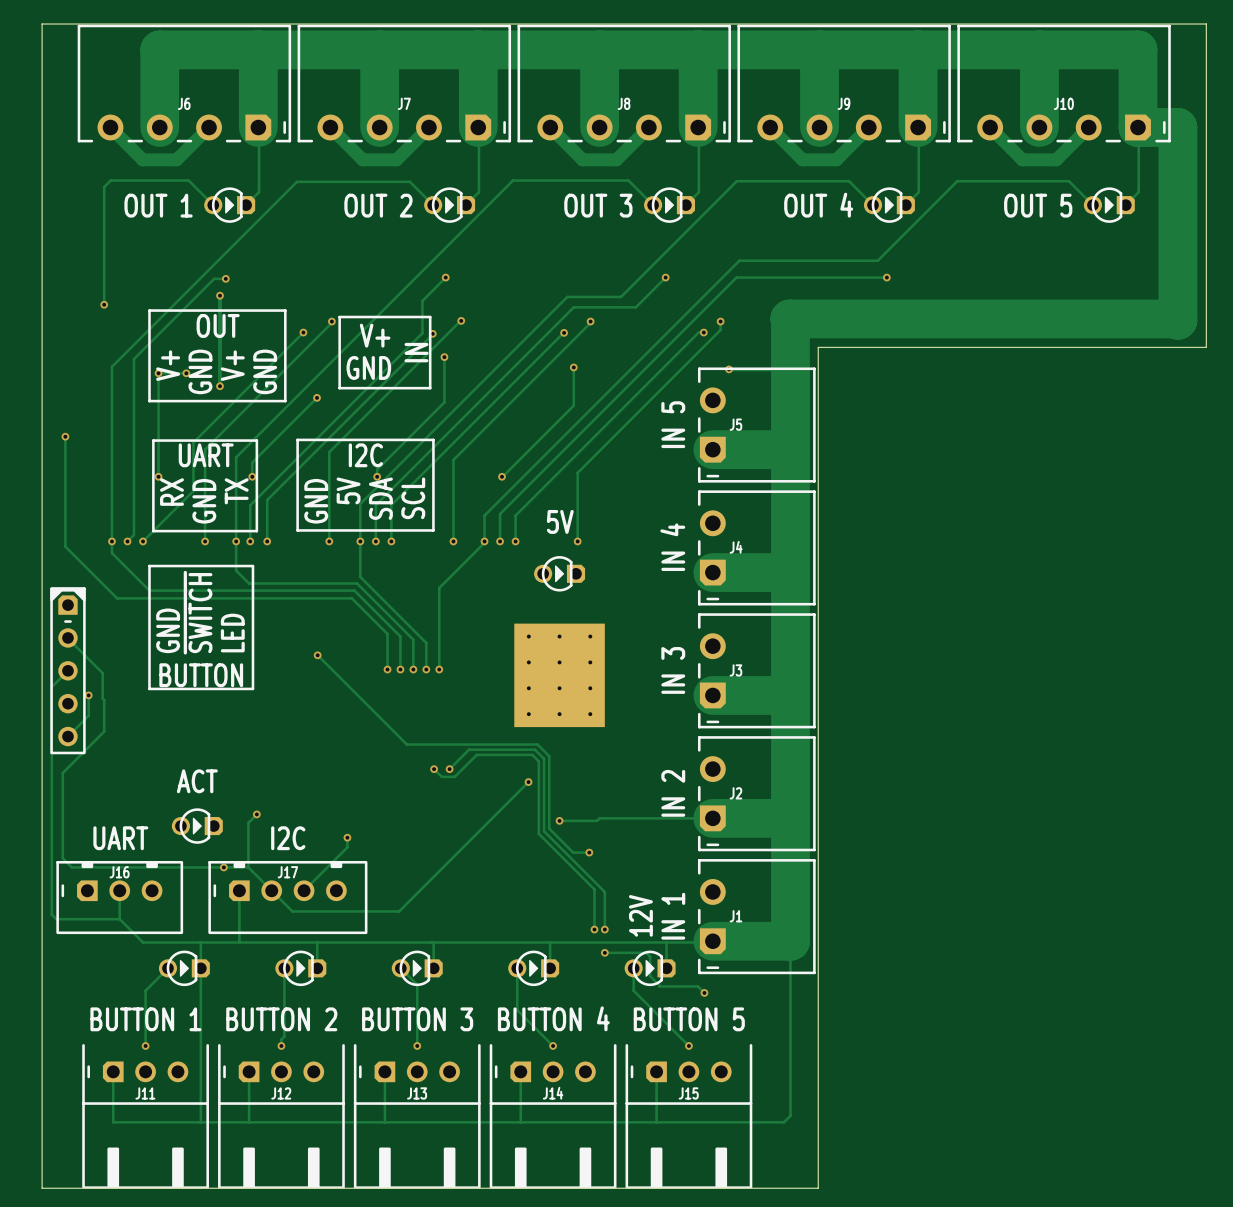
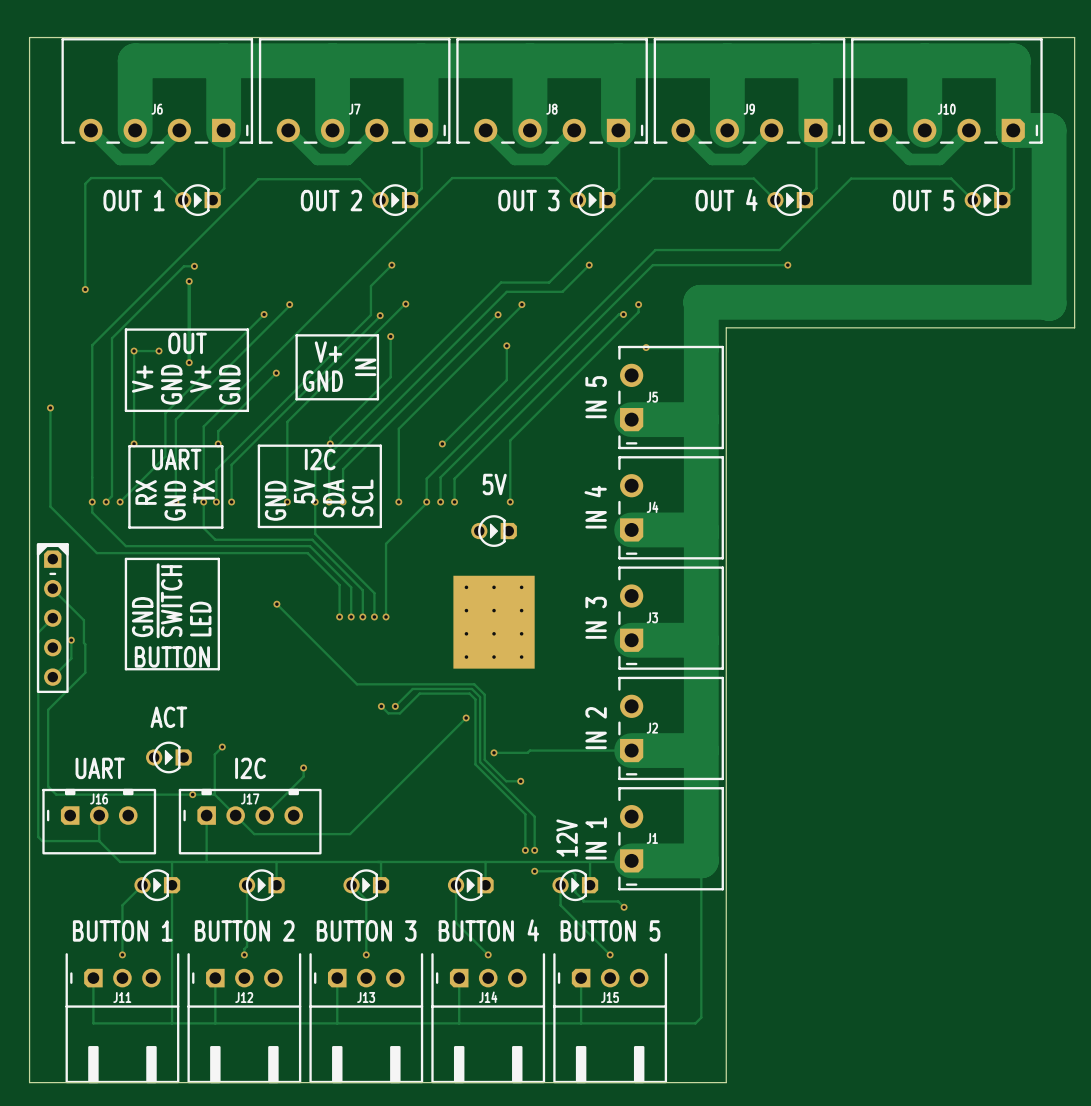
text position: OUT (218, 325) -> OUT (187, 343)
text position: V+ (375, 335) -> V+ (328, 352)
line: (149, 349) (149, 310) (285, 310) (285, 349) -> (125, 329) (247, 329)
text position: IN (416, 352) -> IN (365, 367)
line: (339, 355) (339, 317) (430, 317) (430, 355) -> (296, 335) (377, 335)
text position: V+ (168, 365) -> V+ (142, 379)
text position: V+ (232, 365) -> V+ (200, 379)
text position: GND (368, 367) -> GND (322, 381)
text position: GND (200, 371) -> GND (171, 384)
text position: GND (265, 371) -> GND (229, 384)
line: (339, 388) (430, 388) -> (296, 364) (296, 399) (377, 399) (377, 364)
line: (149, 401) (285, 401) -> (125, 376) (125, 410) (247, 410) (247, 376)
text position: UART (206, 455) -> UART (176, 459)
text position: I2C (365, 455) -> I2C (320, 459)
line: (297, 478) (297, 439) (433, 439) (433, 478) -> (258, 445) (380, 445)
line: (153, 479) (153, 440) (256, 440) (256, 479) -> (129, 446) (222, 446)
text position: 5V (348, 490) -> 5V (304, 491)
text position: TX (236, 491) -> TX (204, 491)
text position: RX (171, 492) -> RX (146, 492)
text position: SDA (380, 498) -> SDA (333, 498)
text position: SCL (413, 498) -> SCL (362, 498)
text position: GND (204, 501) -> GND (175, 500)
text position: GND (316, 501) -> GND (275, 500)
line: (297, 530) (433, 530) -> (258, 492) (258, 526) (380, 526) (380, 492)
line: (153, 531) (256, 531) -> (129, 492) (129, 527) (222, 527) (222, 492)
line: (149, 604) (149, 566) (252, 566) (252, 604) -> (125, 558) (218, 558)
text position: ~{SWITCH} (198, 612) -> ~{SWITCH} (169, 600)
text position: GND (168, 630) -> GND (142, 617)
text position: LED (232, 633) -> LED (200, 619)
text position: BUTTON (201, 675) -> BUTTON (172, 656)
line: (149, 688) (252, 688) -> (125, 634) (125, 669) (218, 669) (218, 634)

